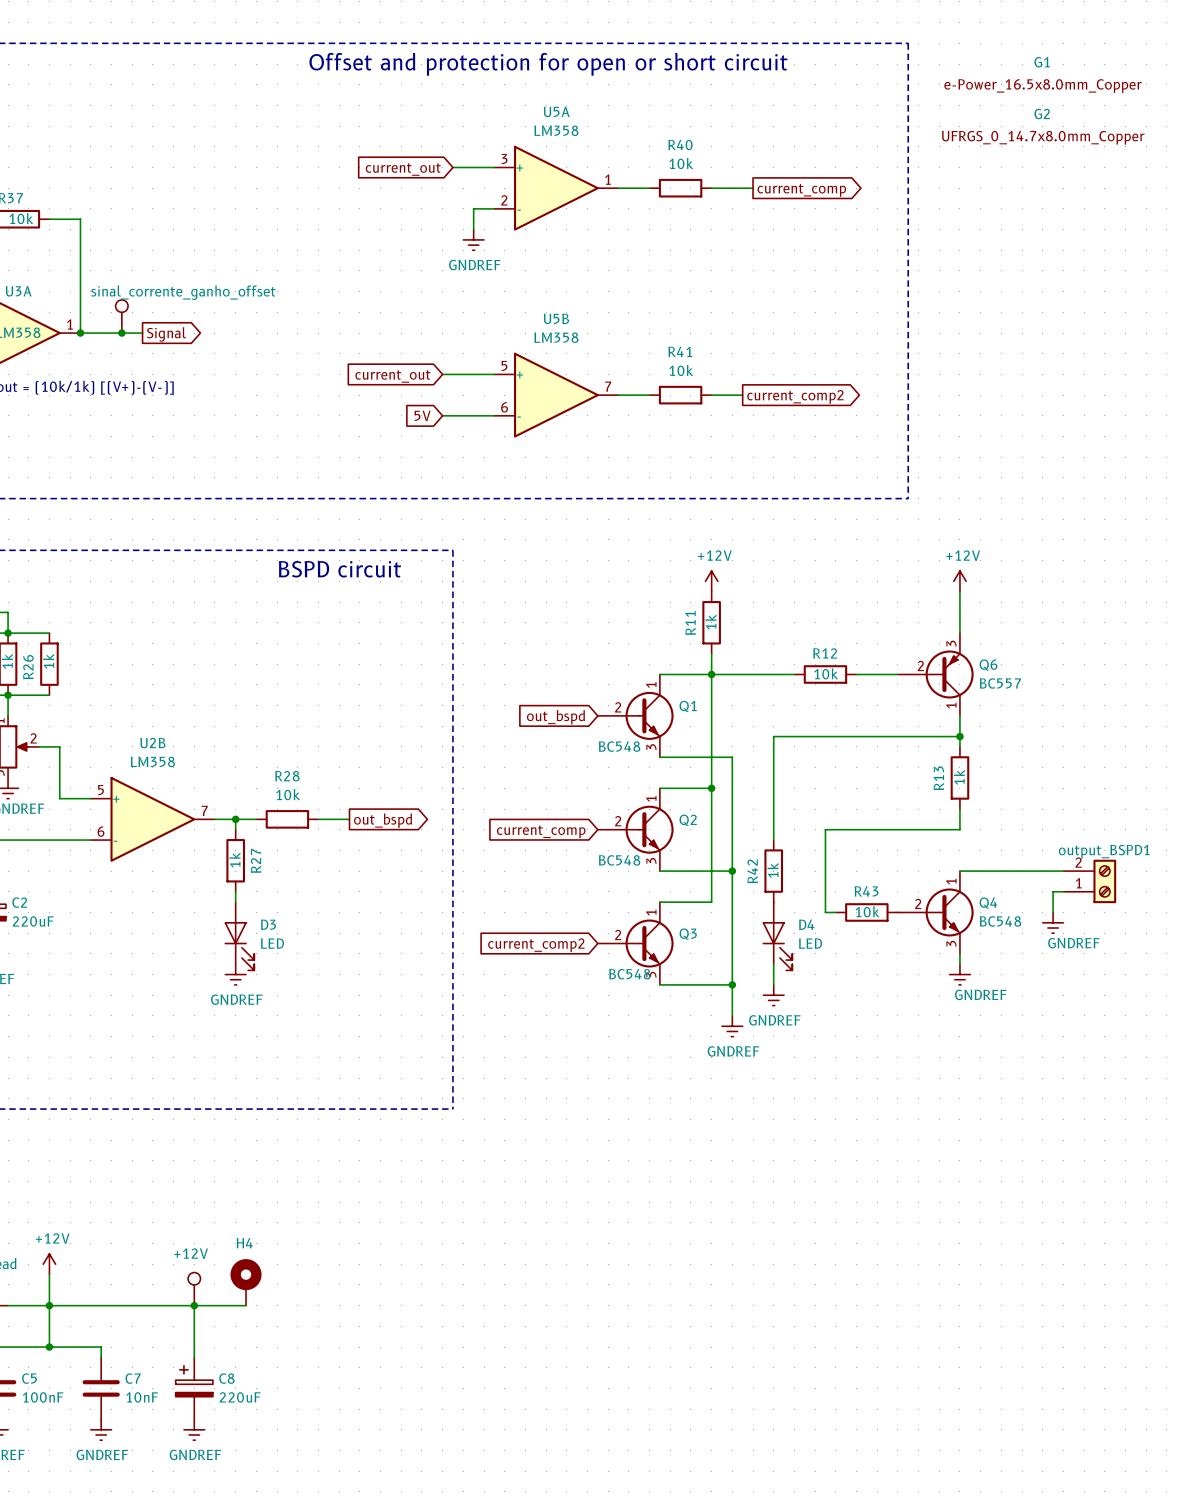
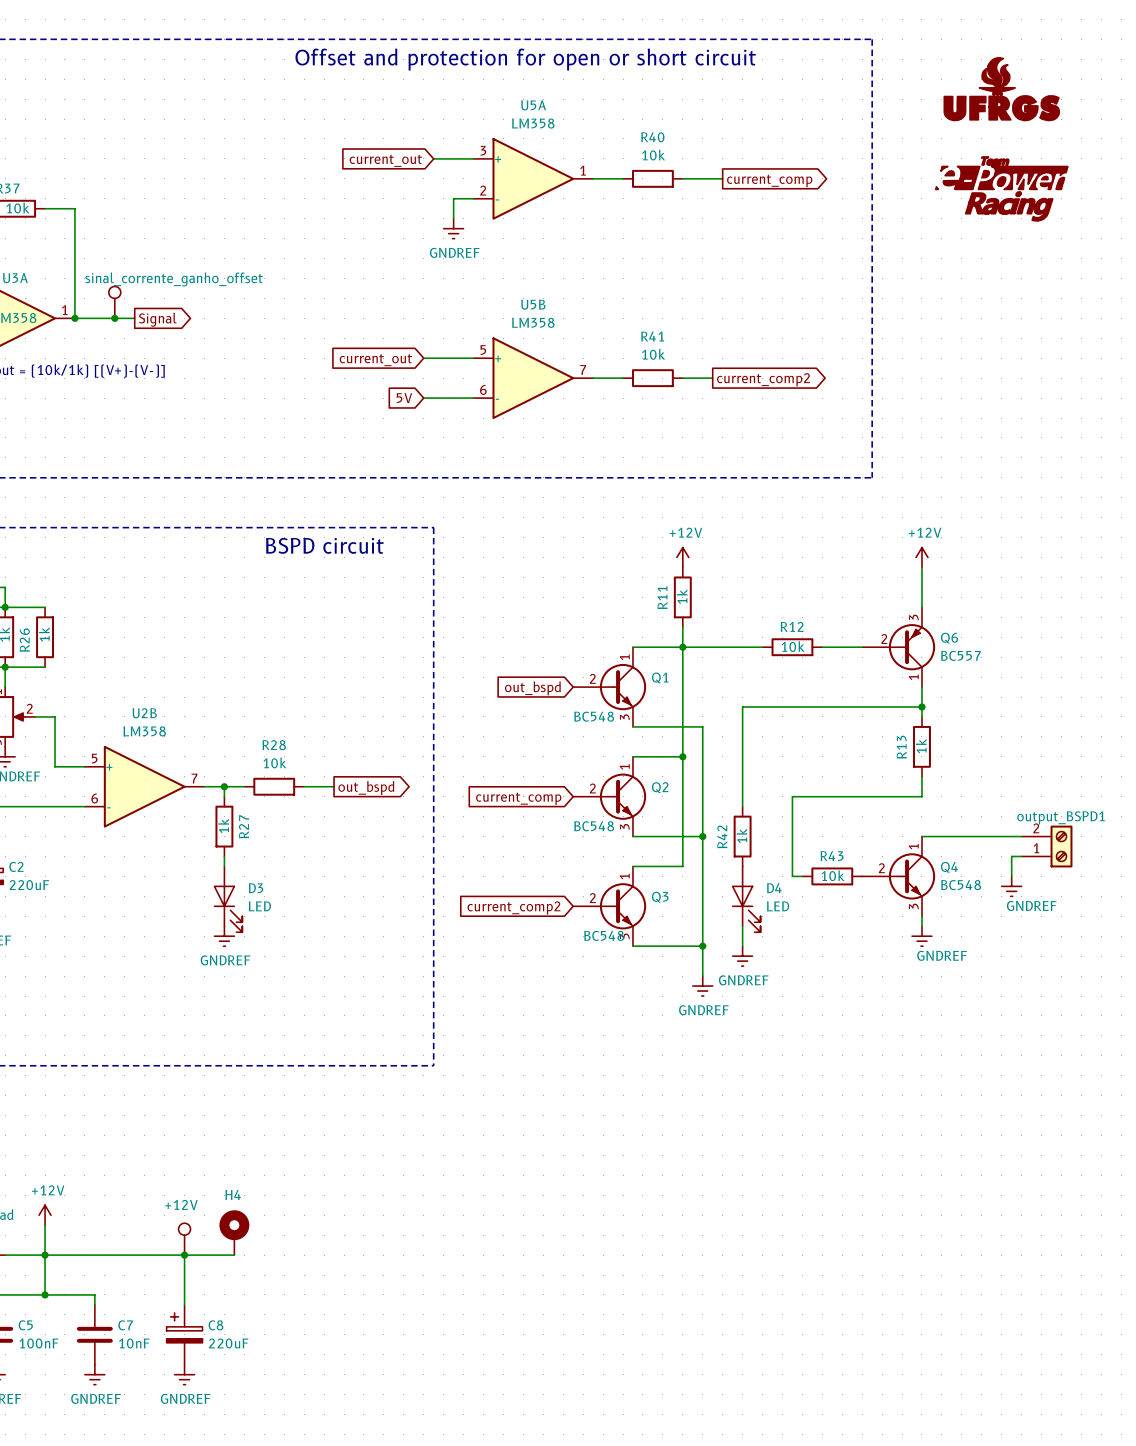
G1: (1043, 74) -> none
part: none -> (1001, 89)
G2: (1043, 126) -> none
part: none -> (1001, 188)

